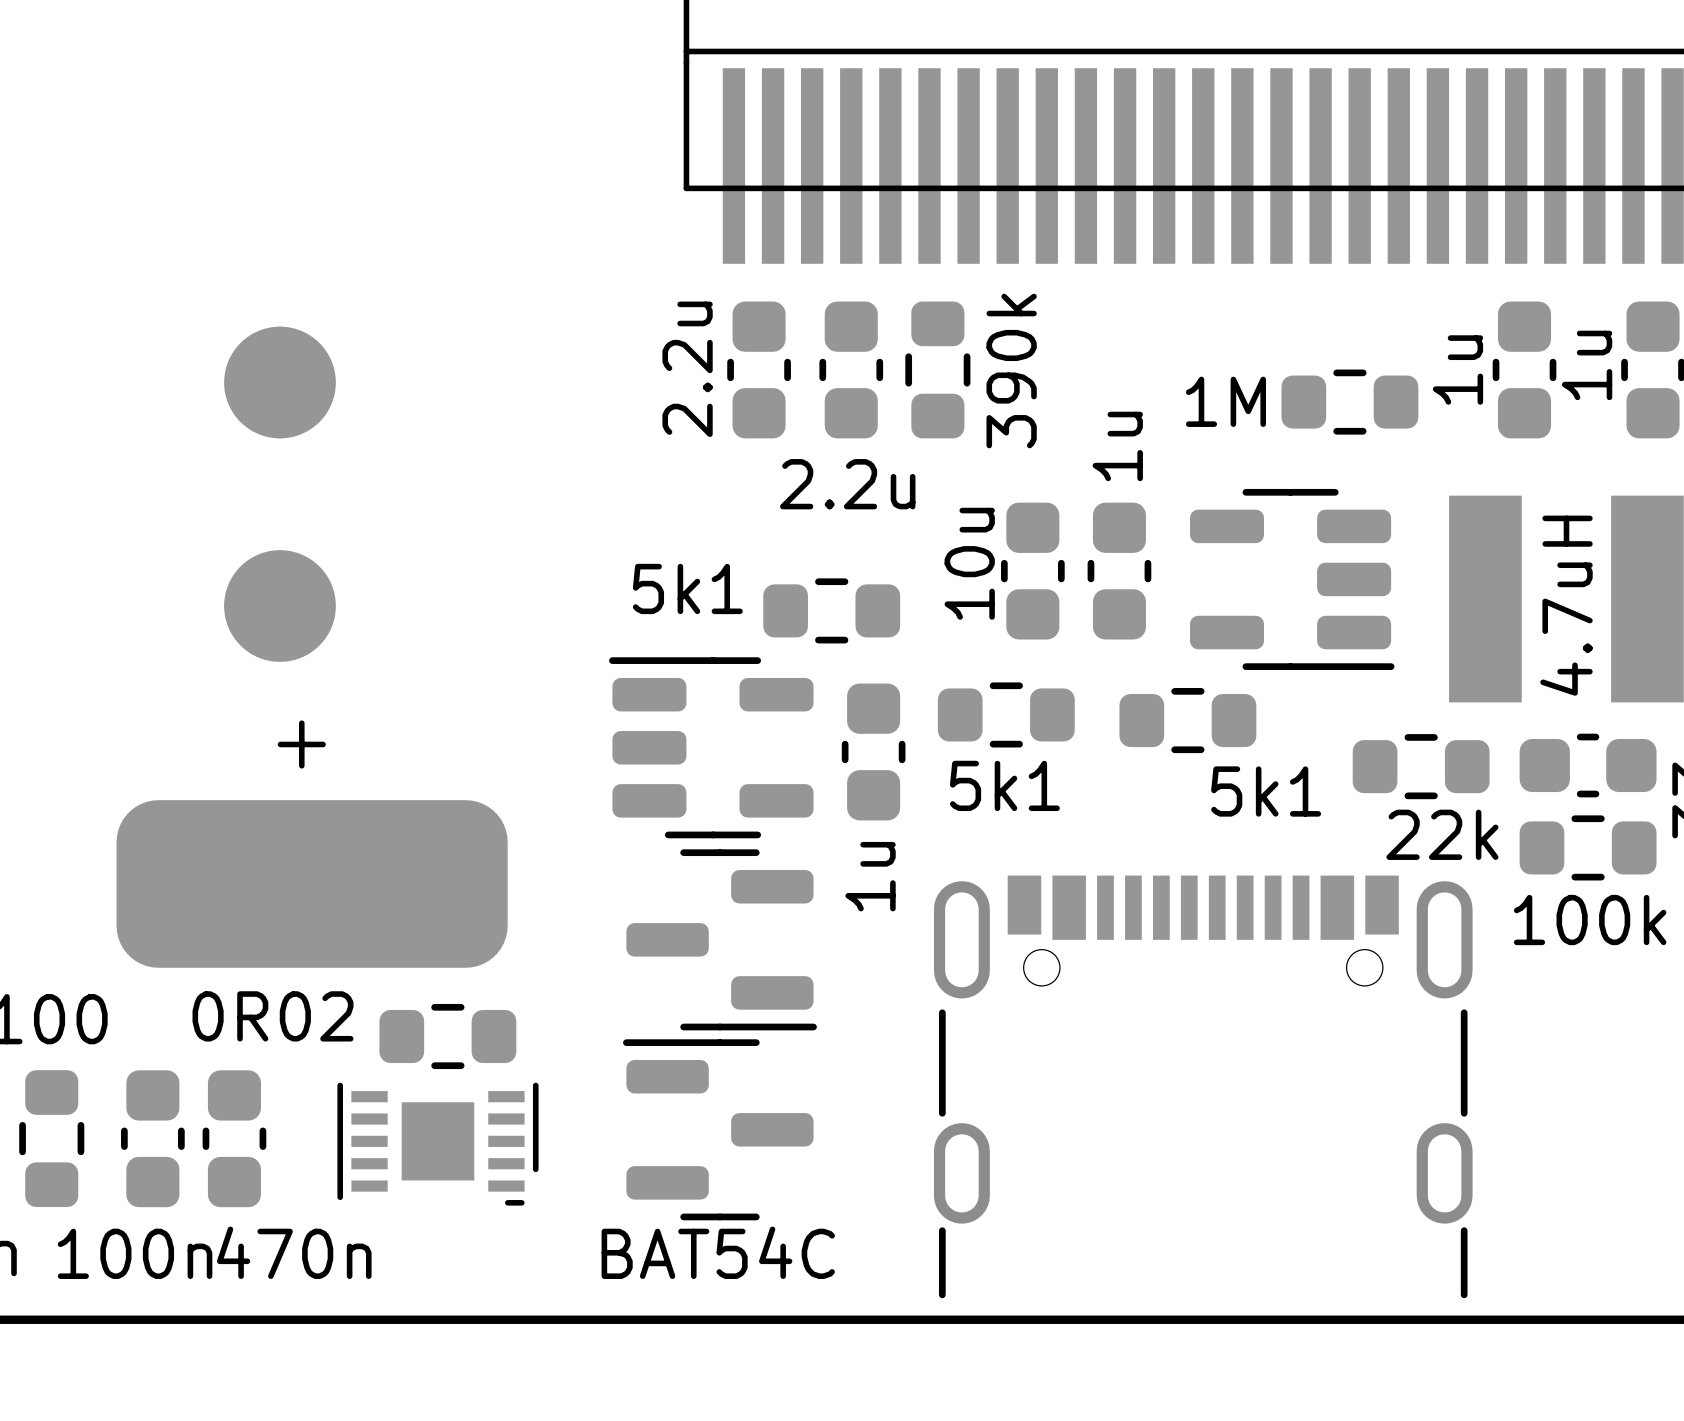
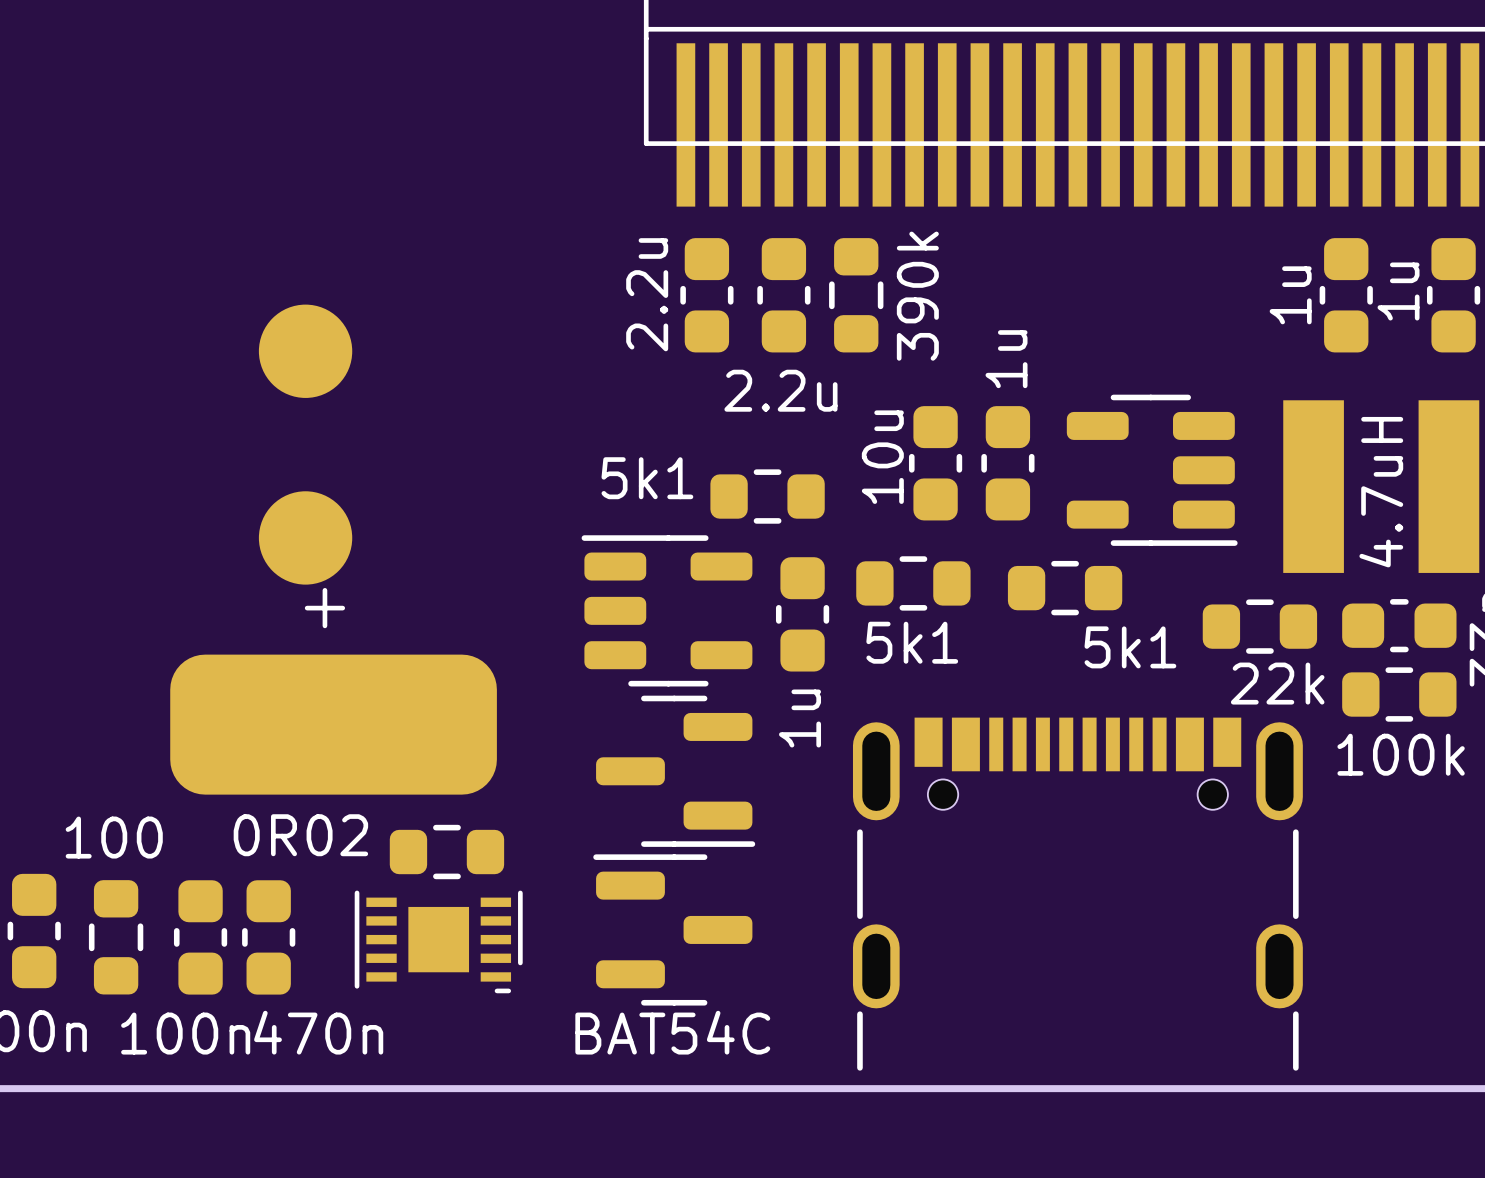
part: 1M (1349, 402) -> none
part position: (279, 494) -> (305, 444)

